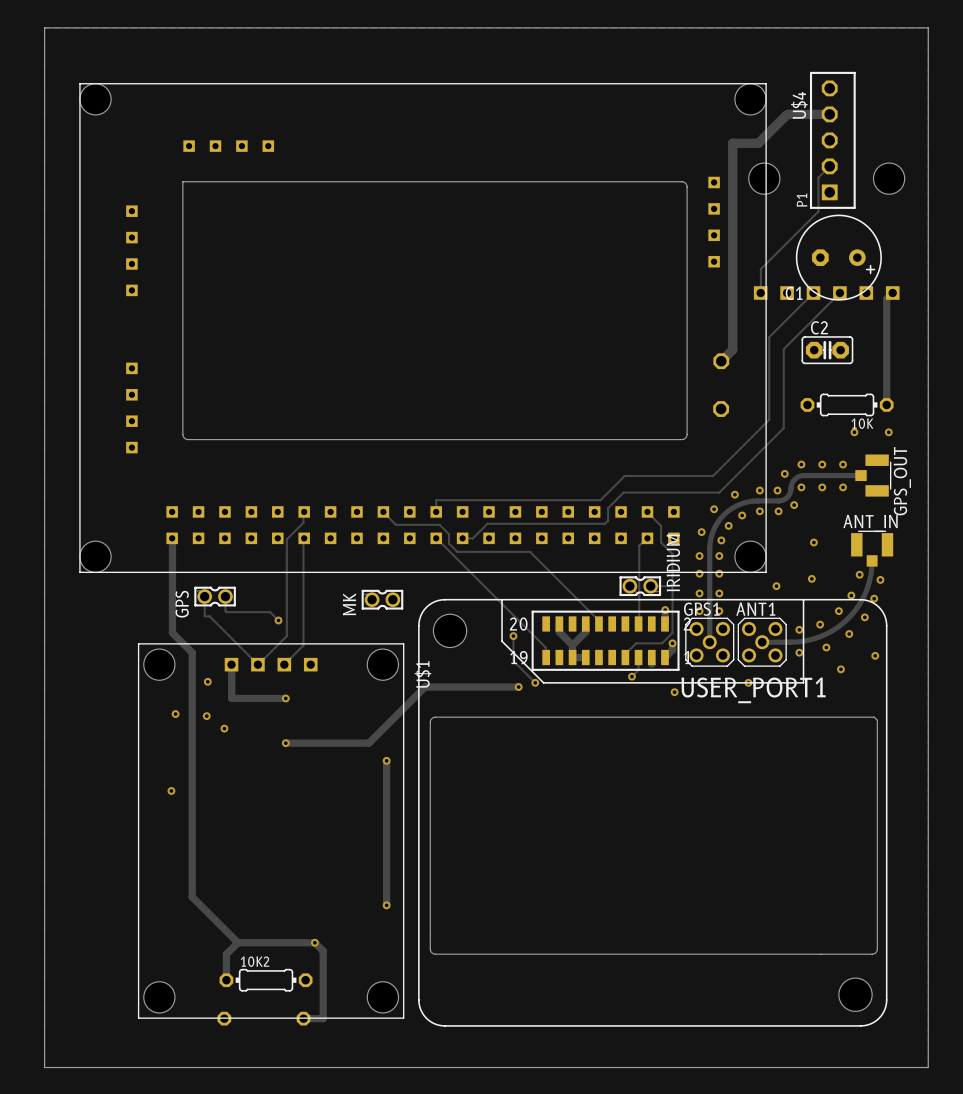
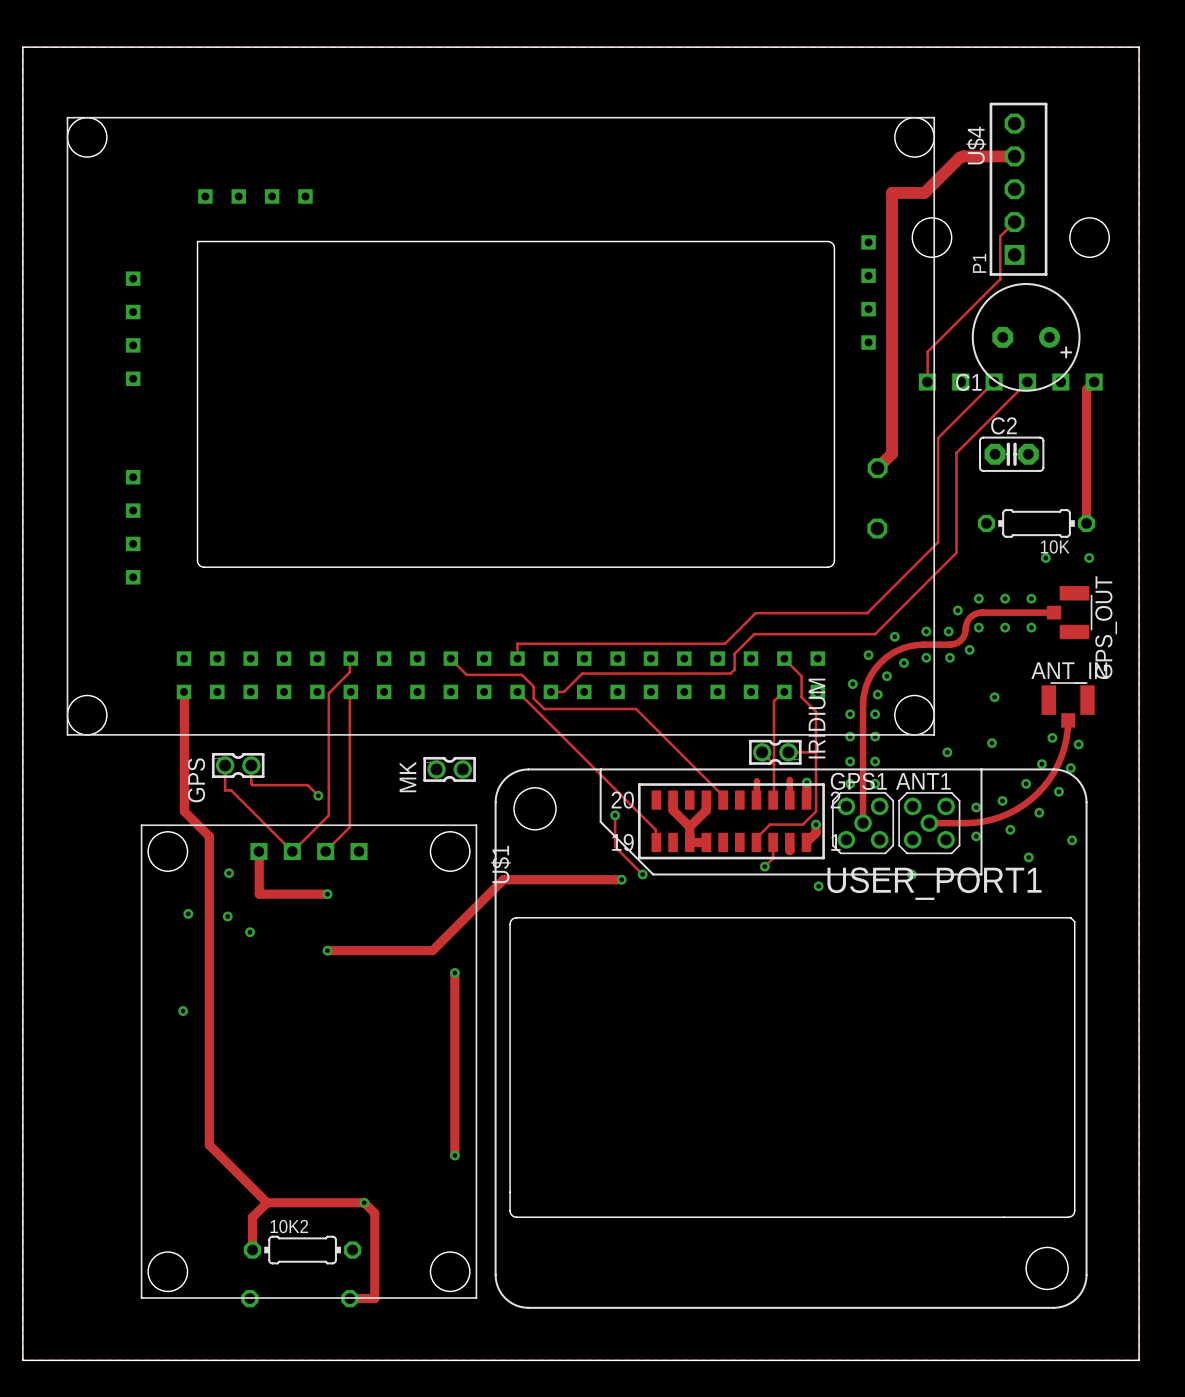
track: none -> (789, 779) (789, 800)
track: none -> (756, 781) (756, 800)

